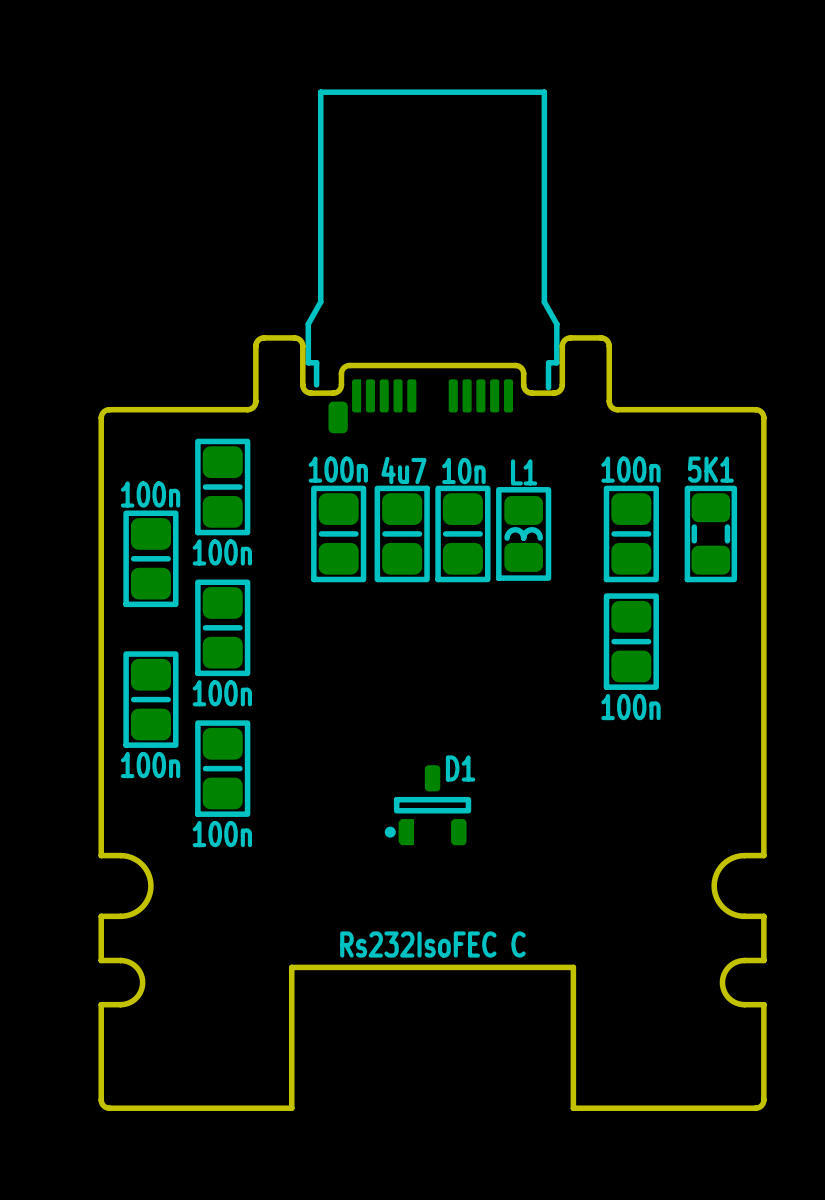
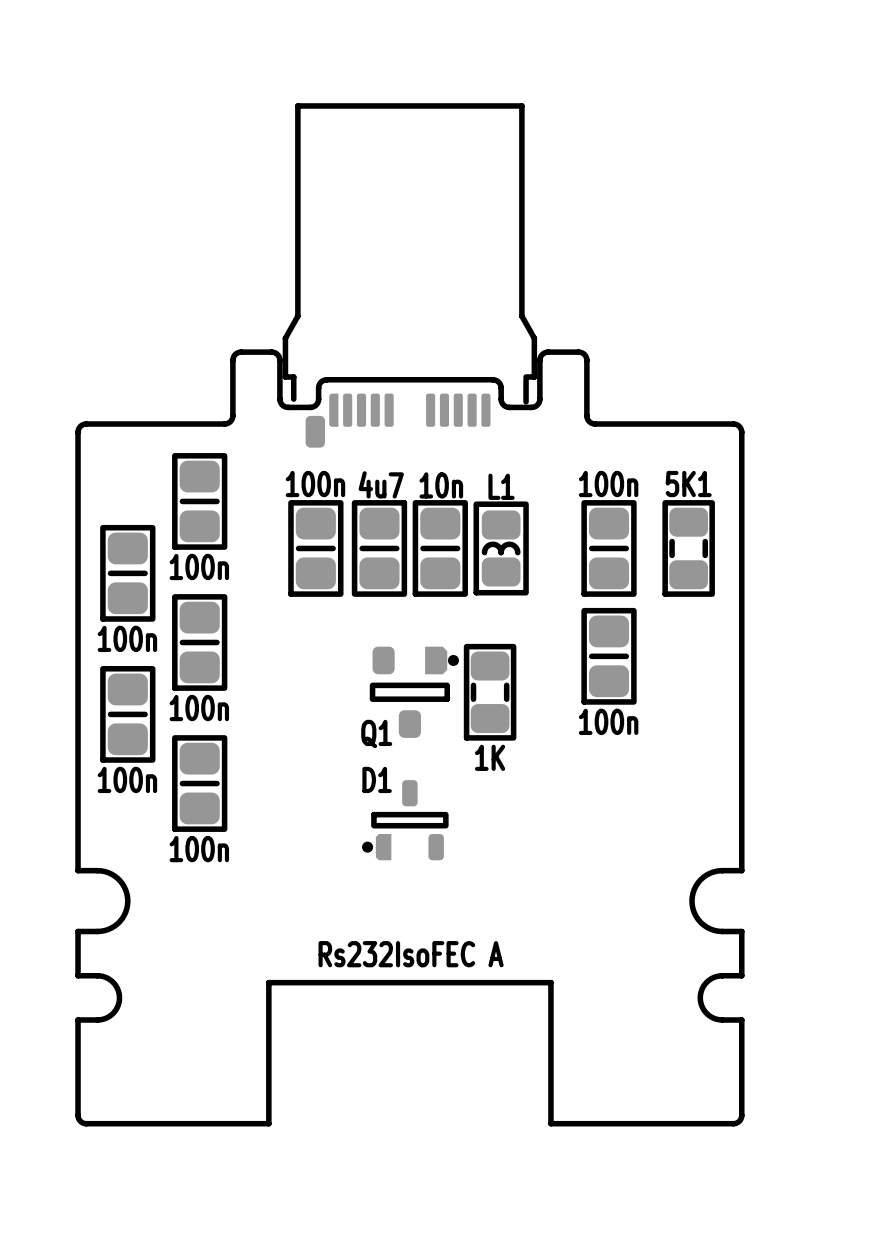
part value position: 100n (150, 494) -> 100n (127, 638)
Q1: none -> (414, 692)
part: none -> 1K (490, 692)
D1 name position: D1 (460, 768) -> D1 (377, 779)
text: Rs232IsoFEC C (432, 944) -> Rs232IsoFEC A (411, 954)

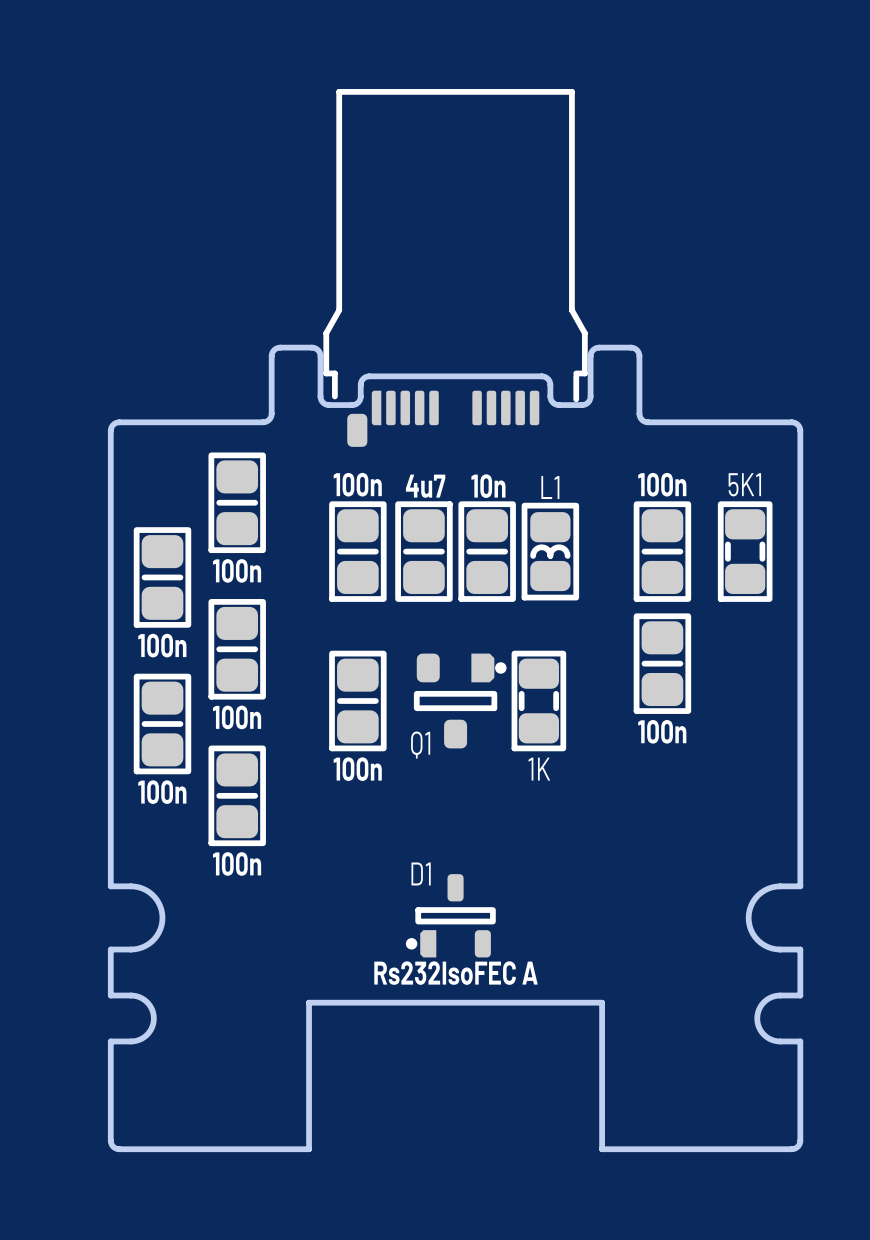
part: none -> 100n (357, 701)
D1 position: (405, 820) -> (450, 915)

